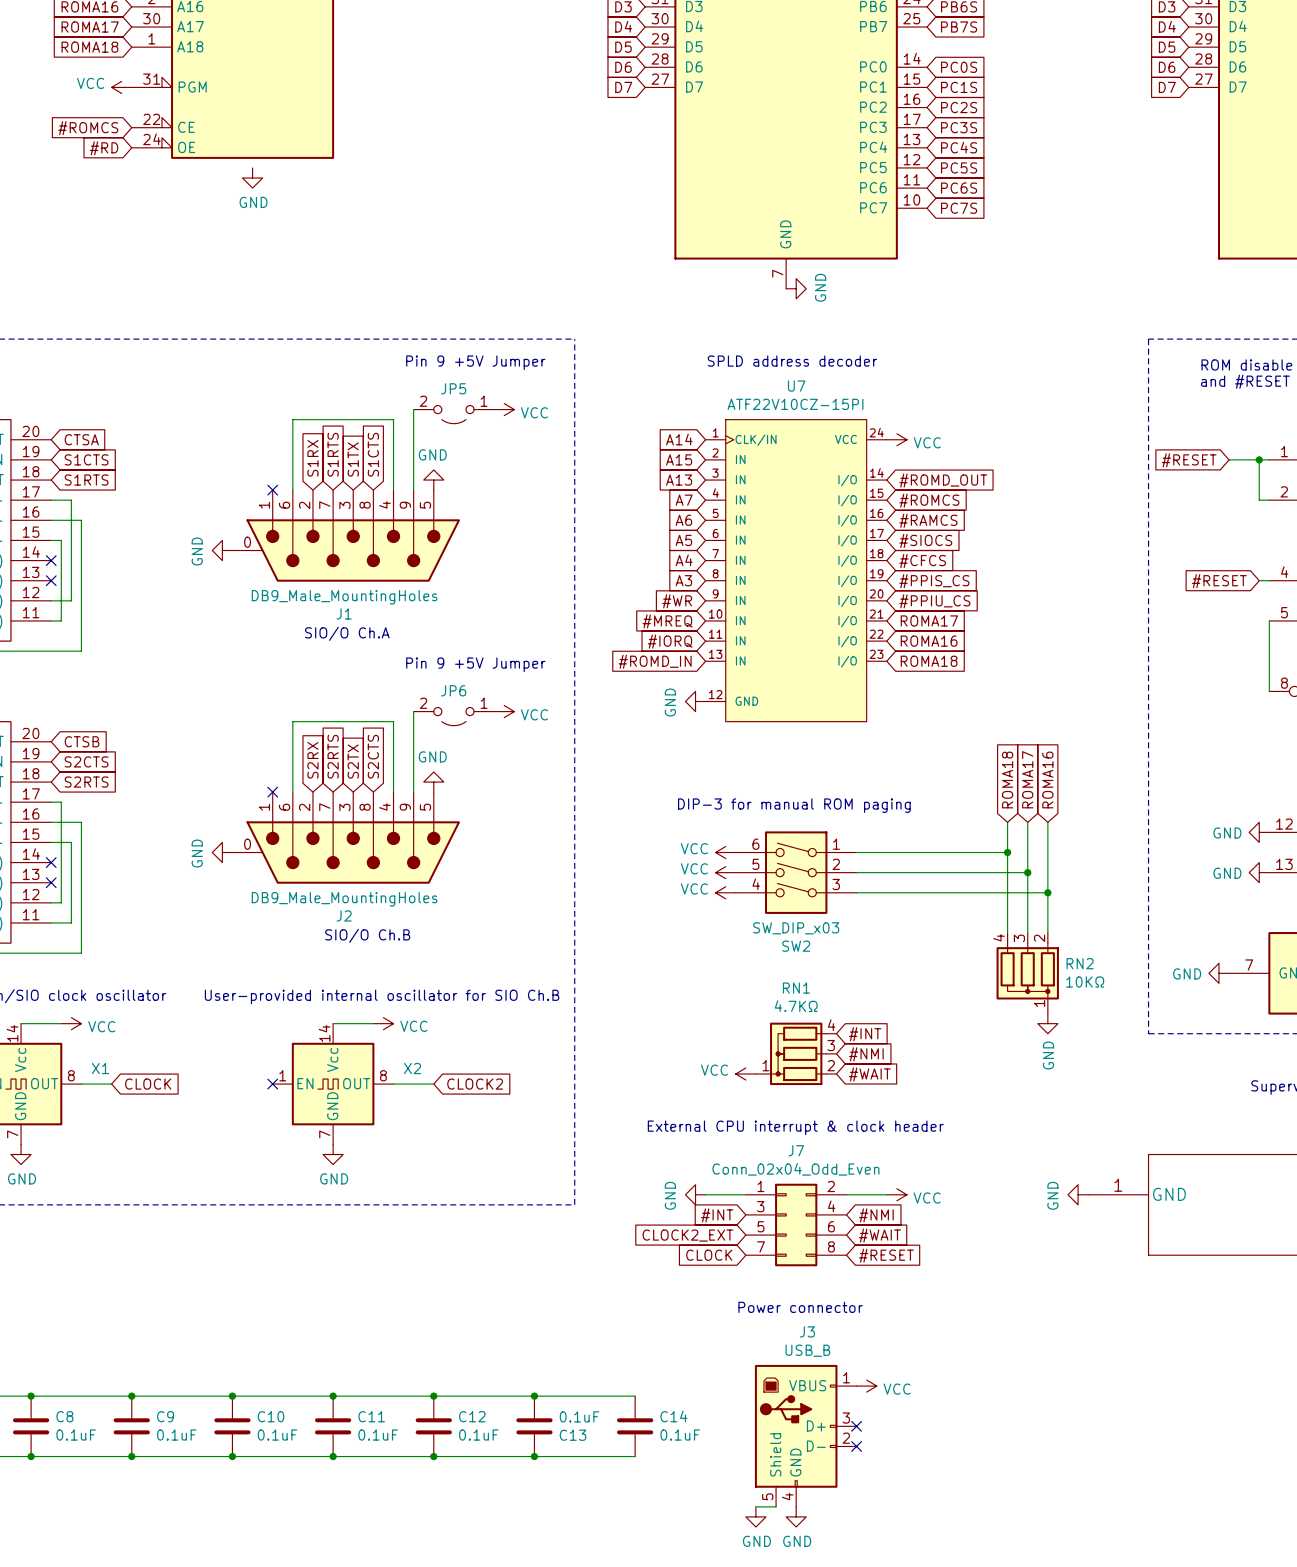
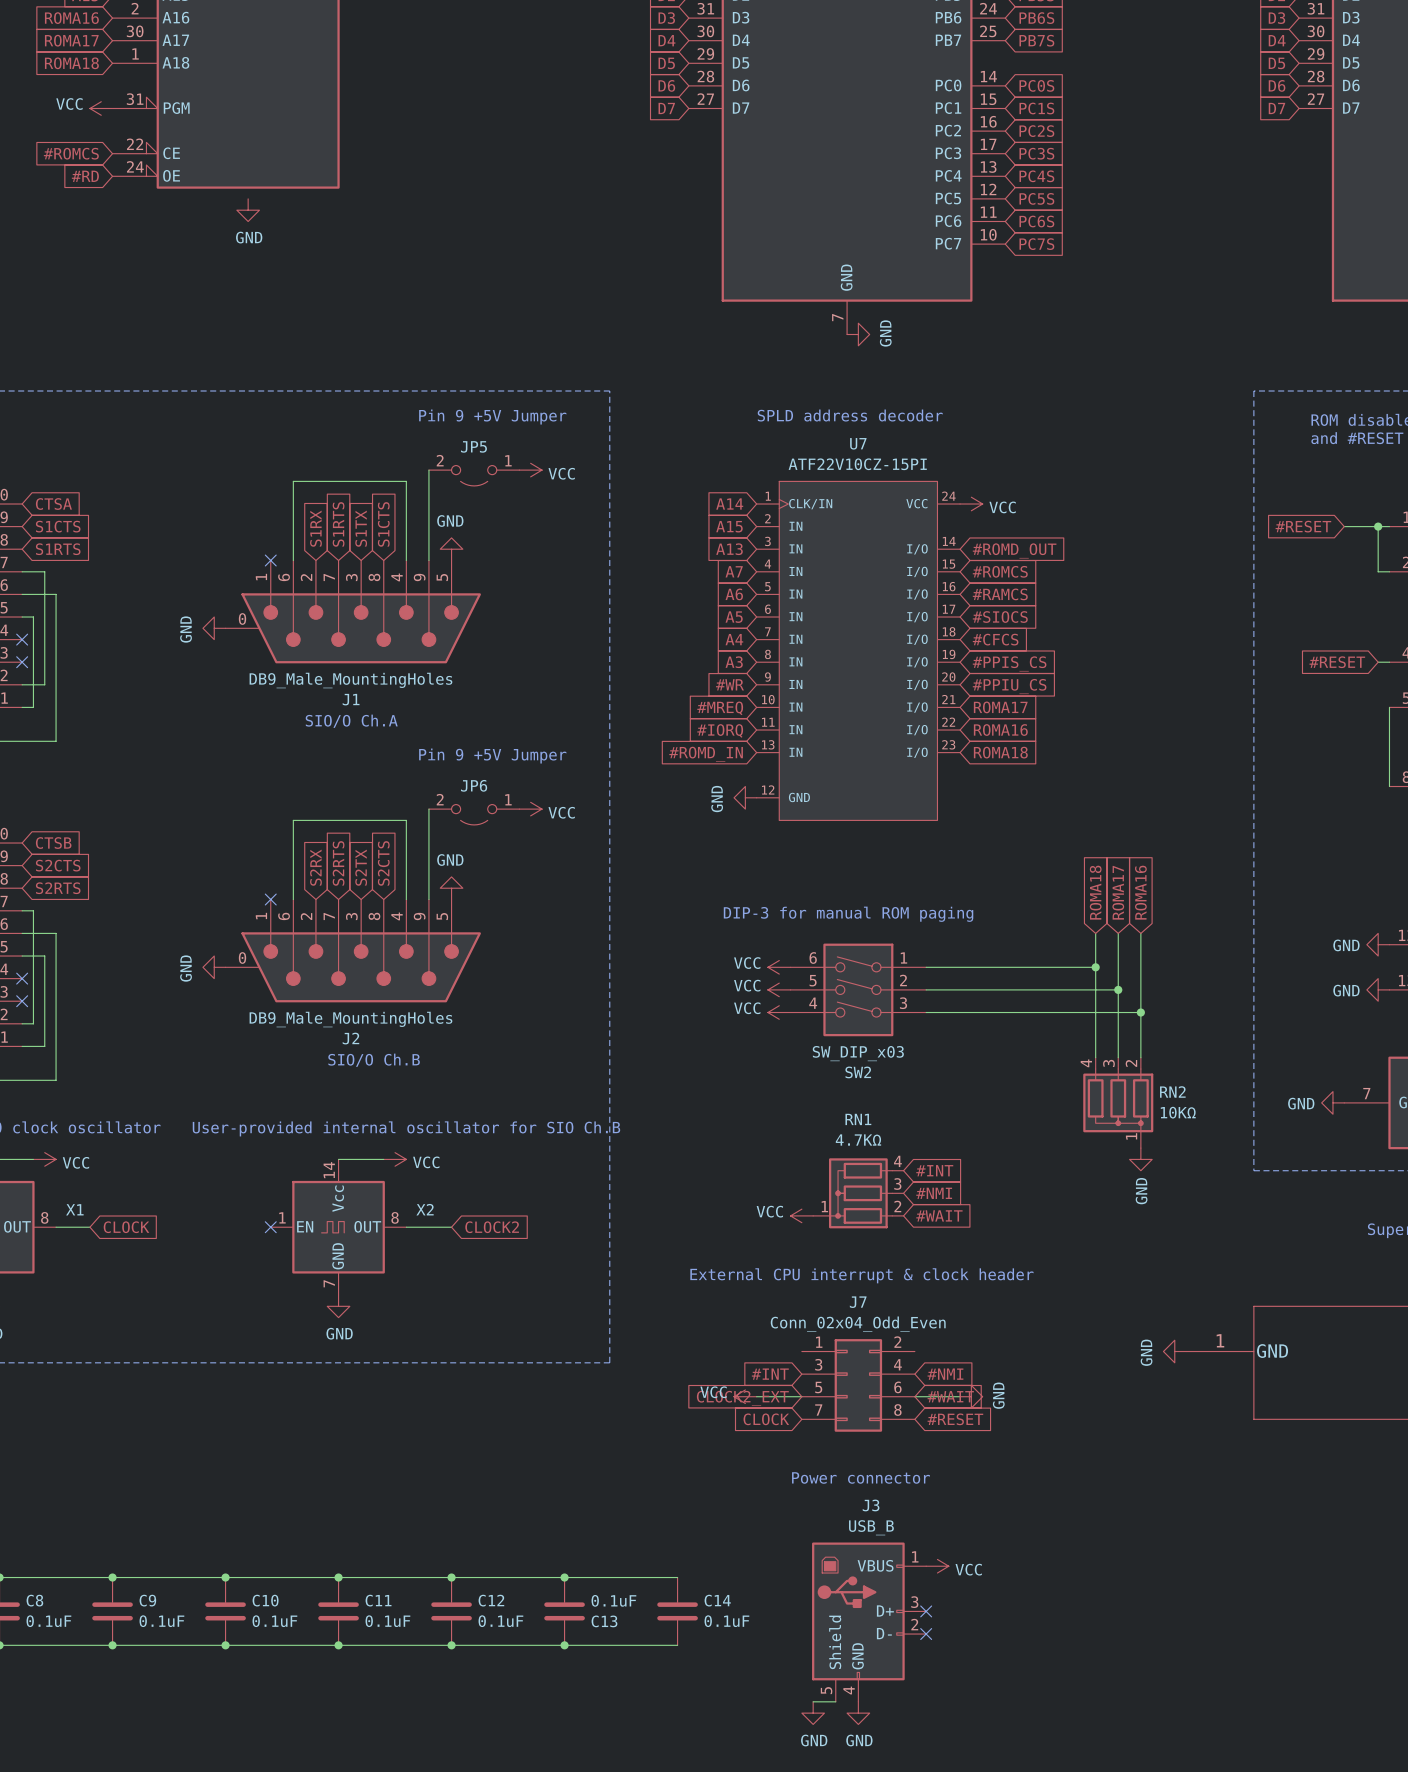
power symbol: GND (695, 1194) -> none
wire: (705, 1194) (745, 1194) -> (756, 1396) (801, 1396)
wire: (846, 1194) (886, 1194) -> (914, 1396) (960, 1396)
power symbol: VCC (896, 1194) -> none
power symbol: none -> VCC (745, 1396)
power symbol: none -> GND (971, 1396)

